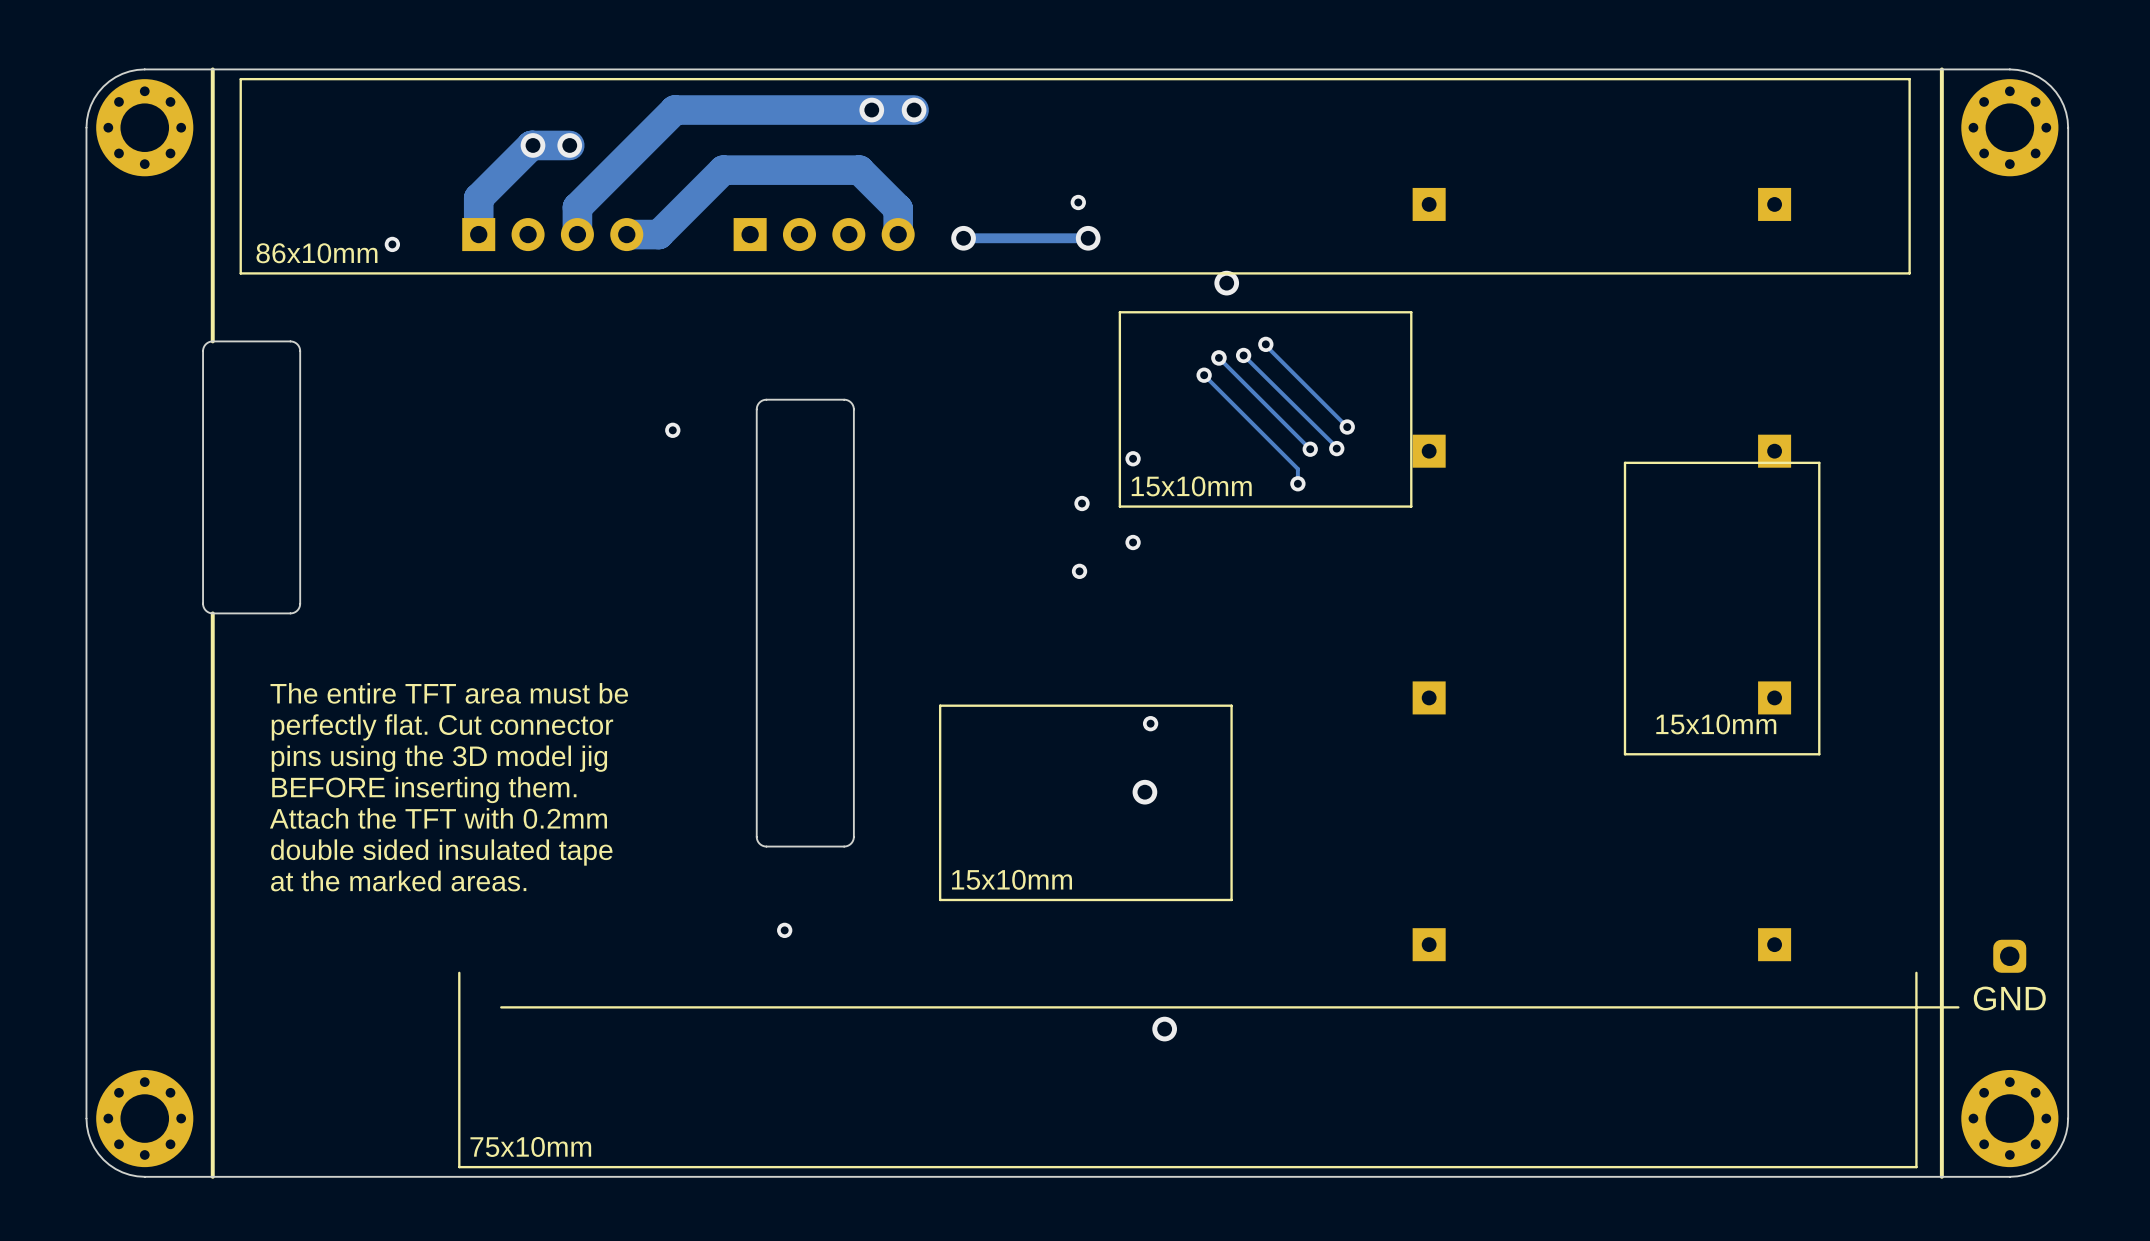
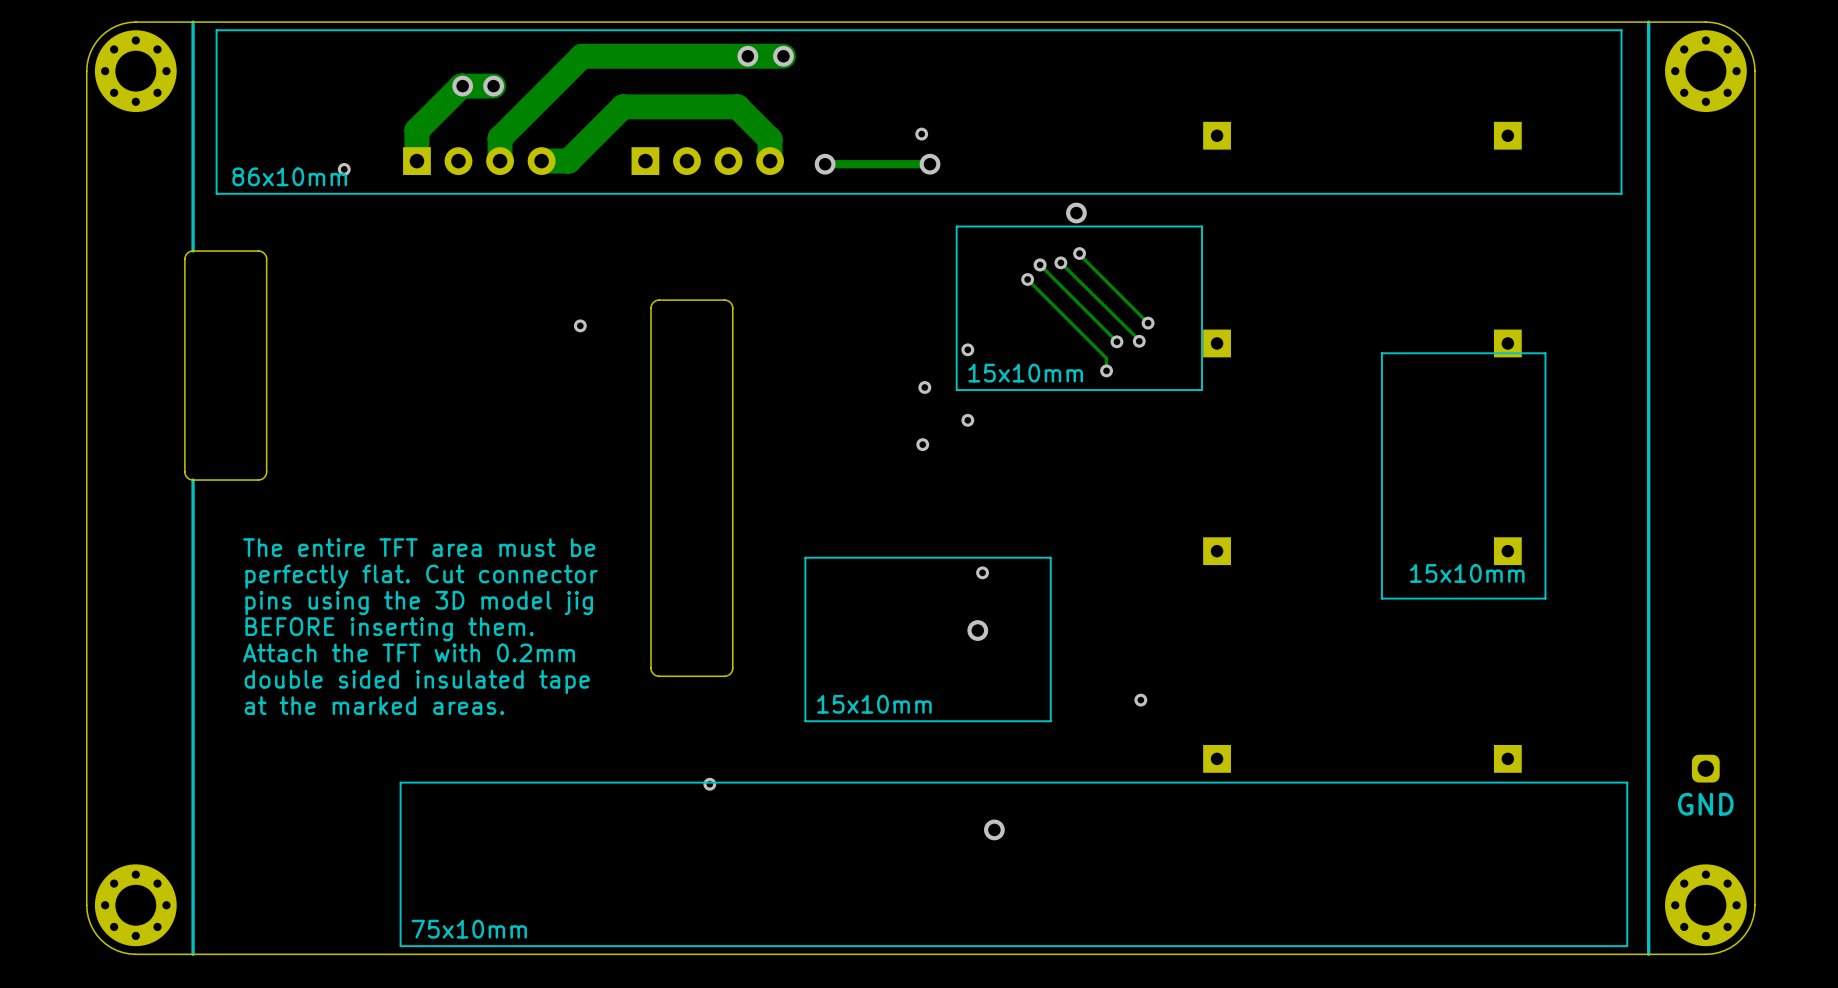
via position: (1226, 283) -> (1076, 213)
via: none -> (1140, 700)
via position: (784, 930) -> (709, 784)
line: (1958, 1007) (501, 1007) -> (1627, 782) (400, 782)

